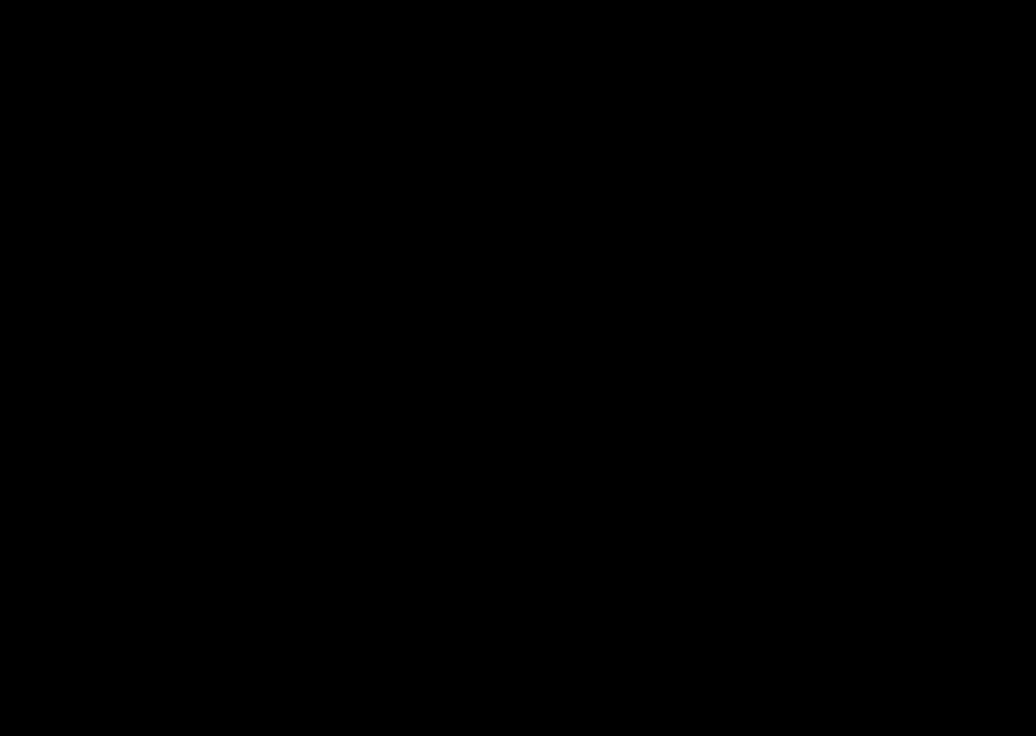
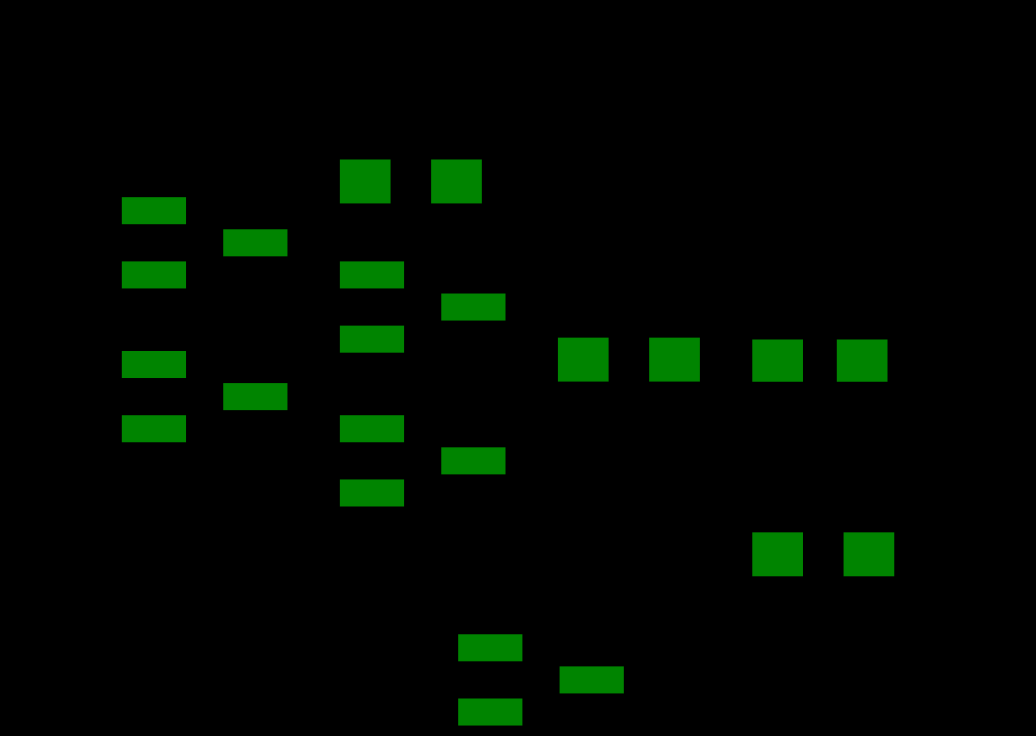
part: none -> (410, 181)
part: none -> (204, 242)
part: none -> (422, 307)
part: none -> (628, 359)
part: none -> (819, 360)
part: none -> (204, 396)
part: none -> (422, 460)
part: none -> (823, 554)
part: none -> (540, 679)

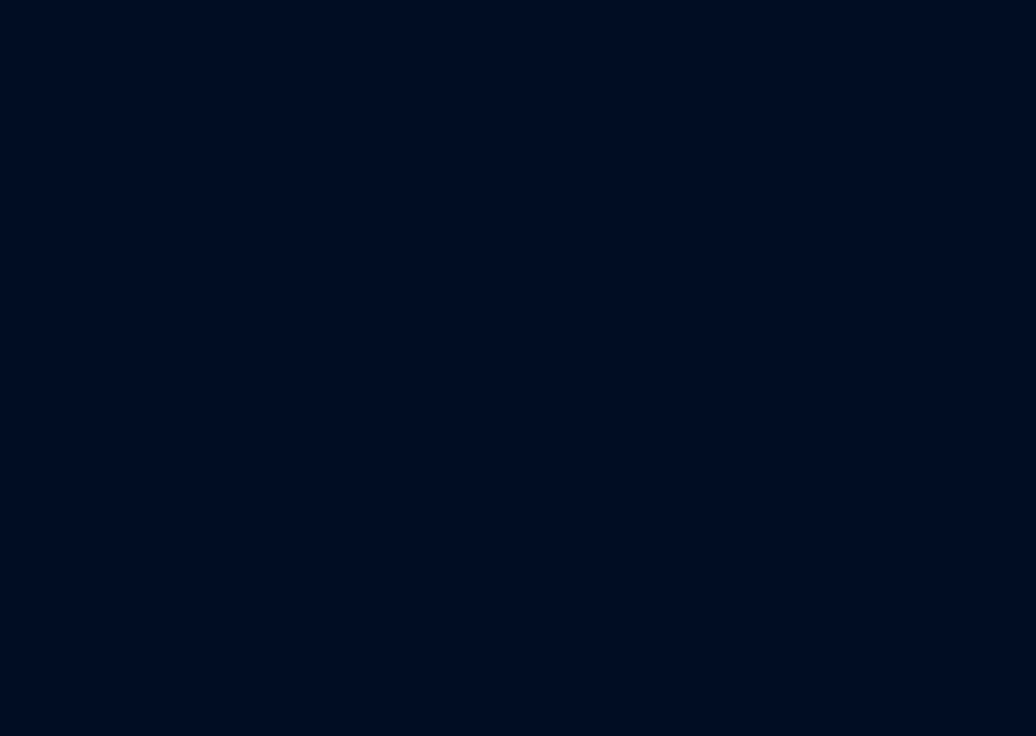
part: (410, 181) -> none
part: (204, 242) -> none
part: (422, 307) -> none
part: (628, 359) -> none
part: (819, 360) -> none
part: (204, 396) -> none
part: (422, 460) -> none
part: (823, 554) -> none
part: (540, 679) -> none

